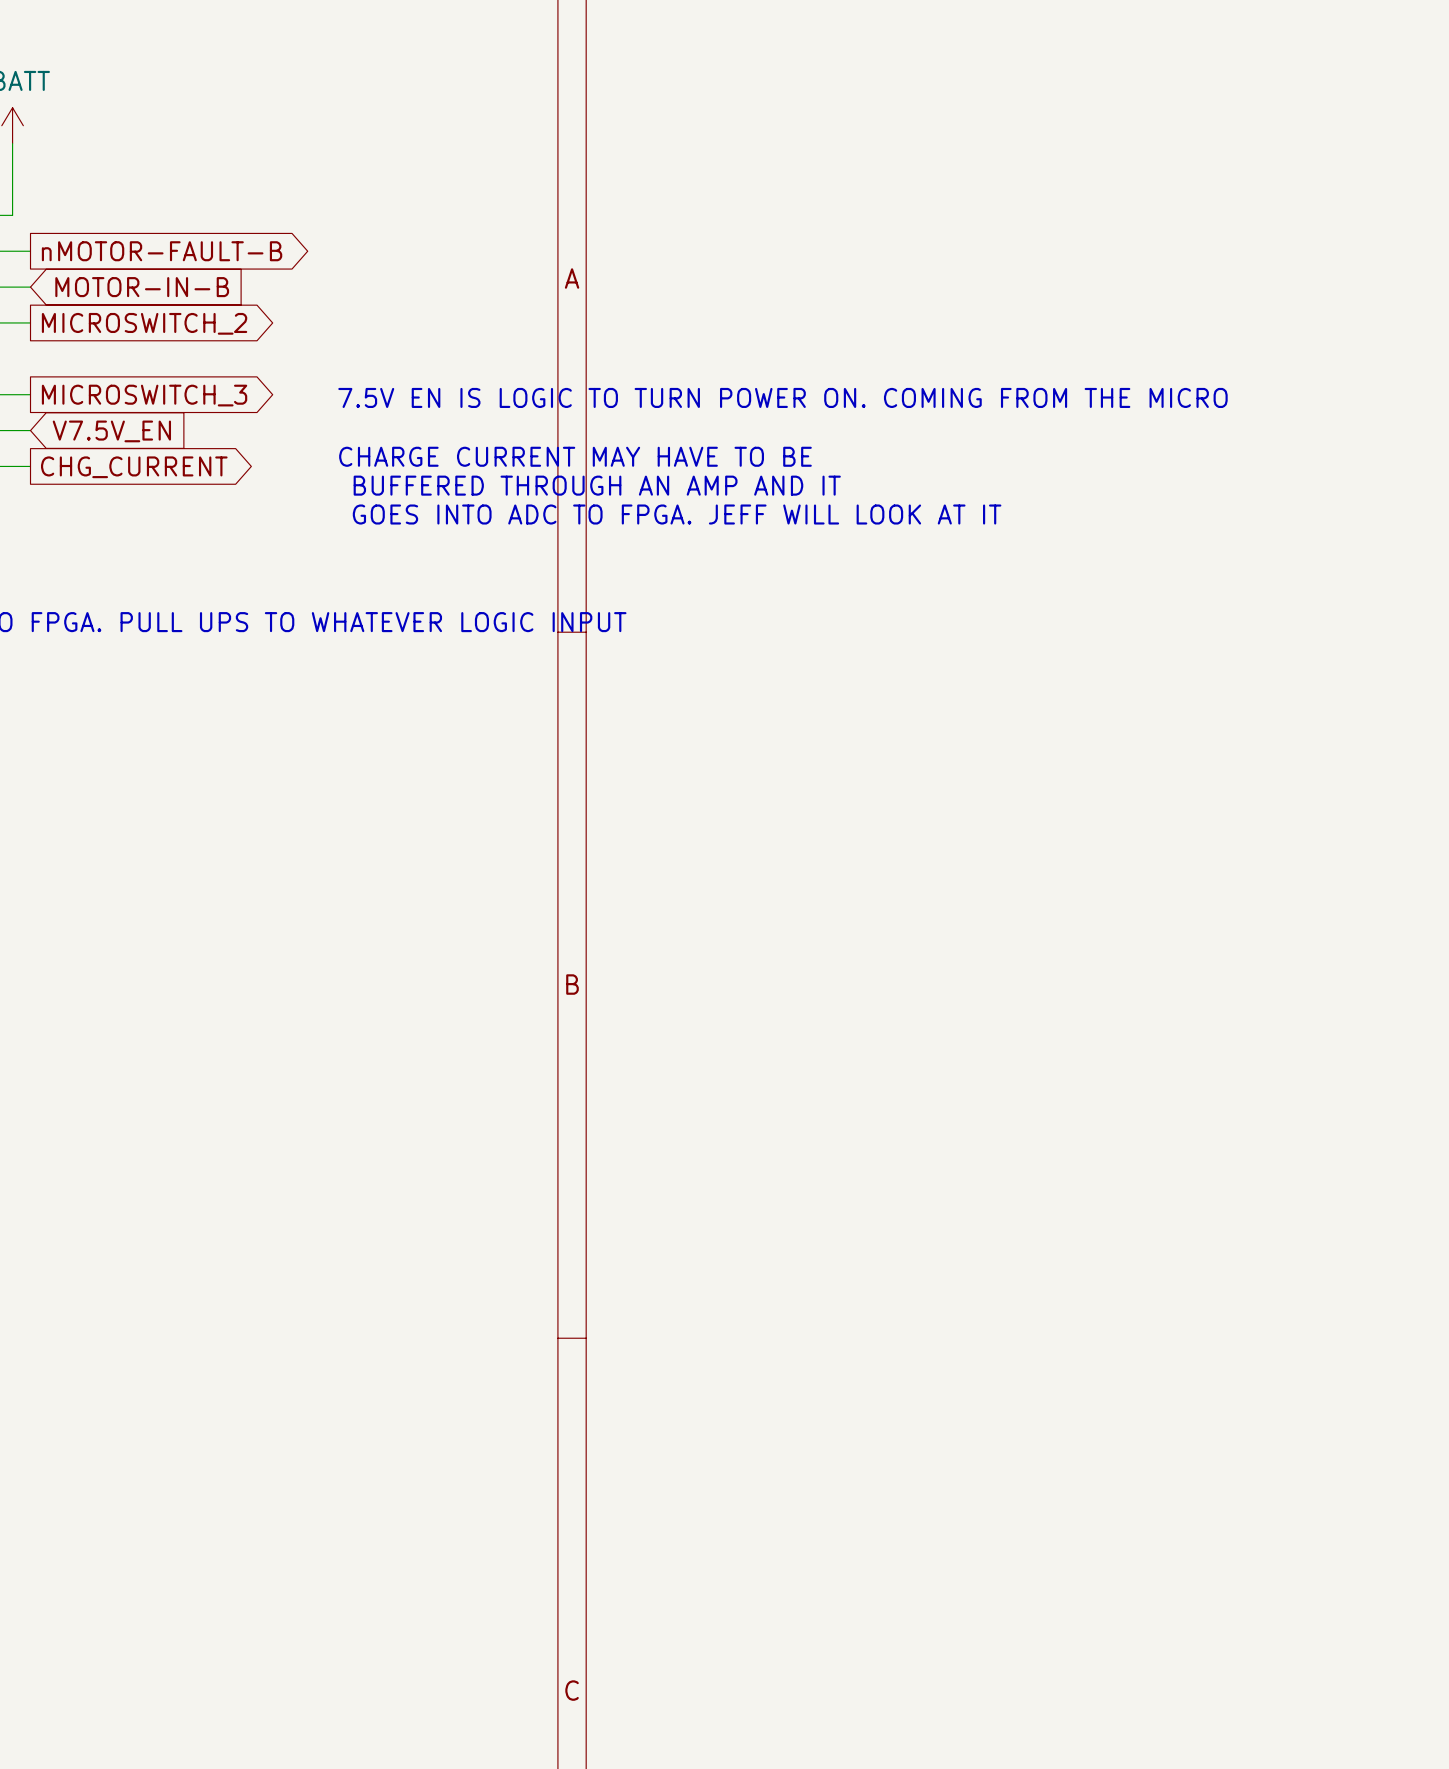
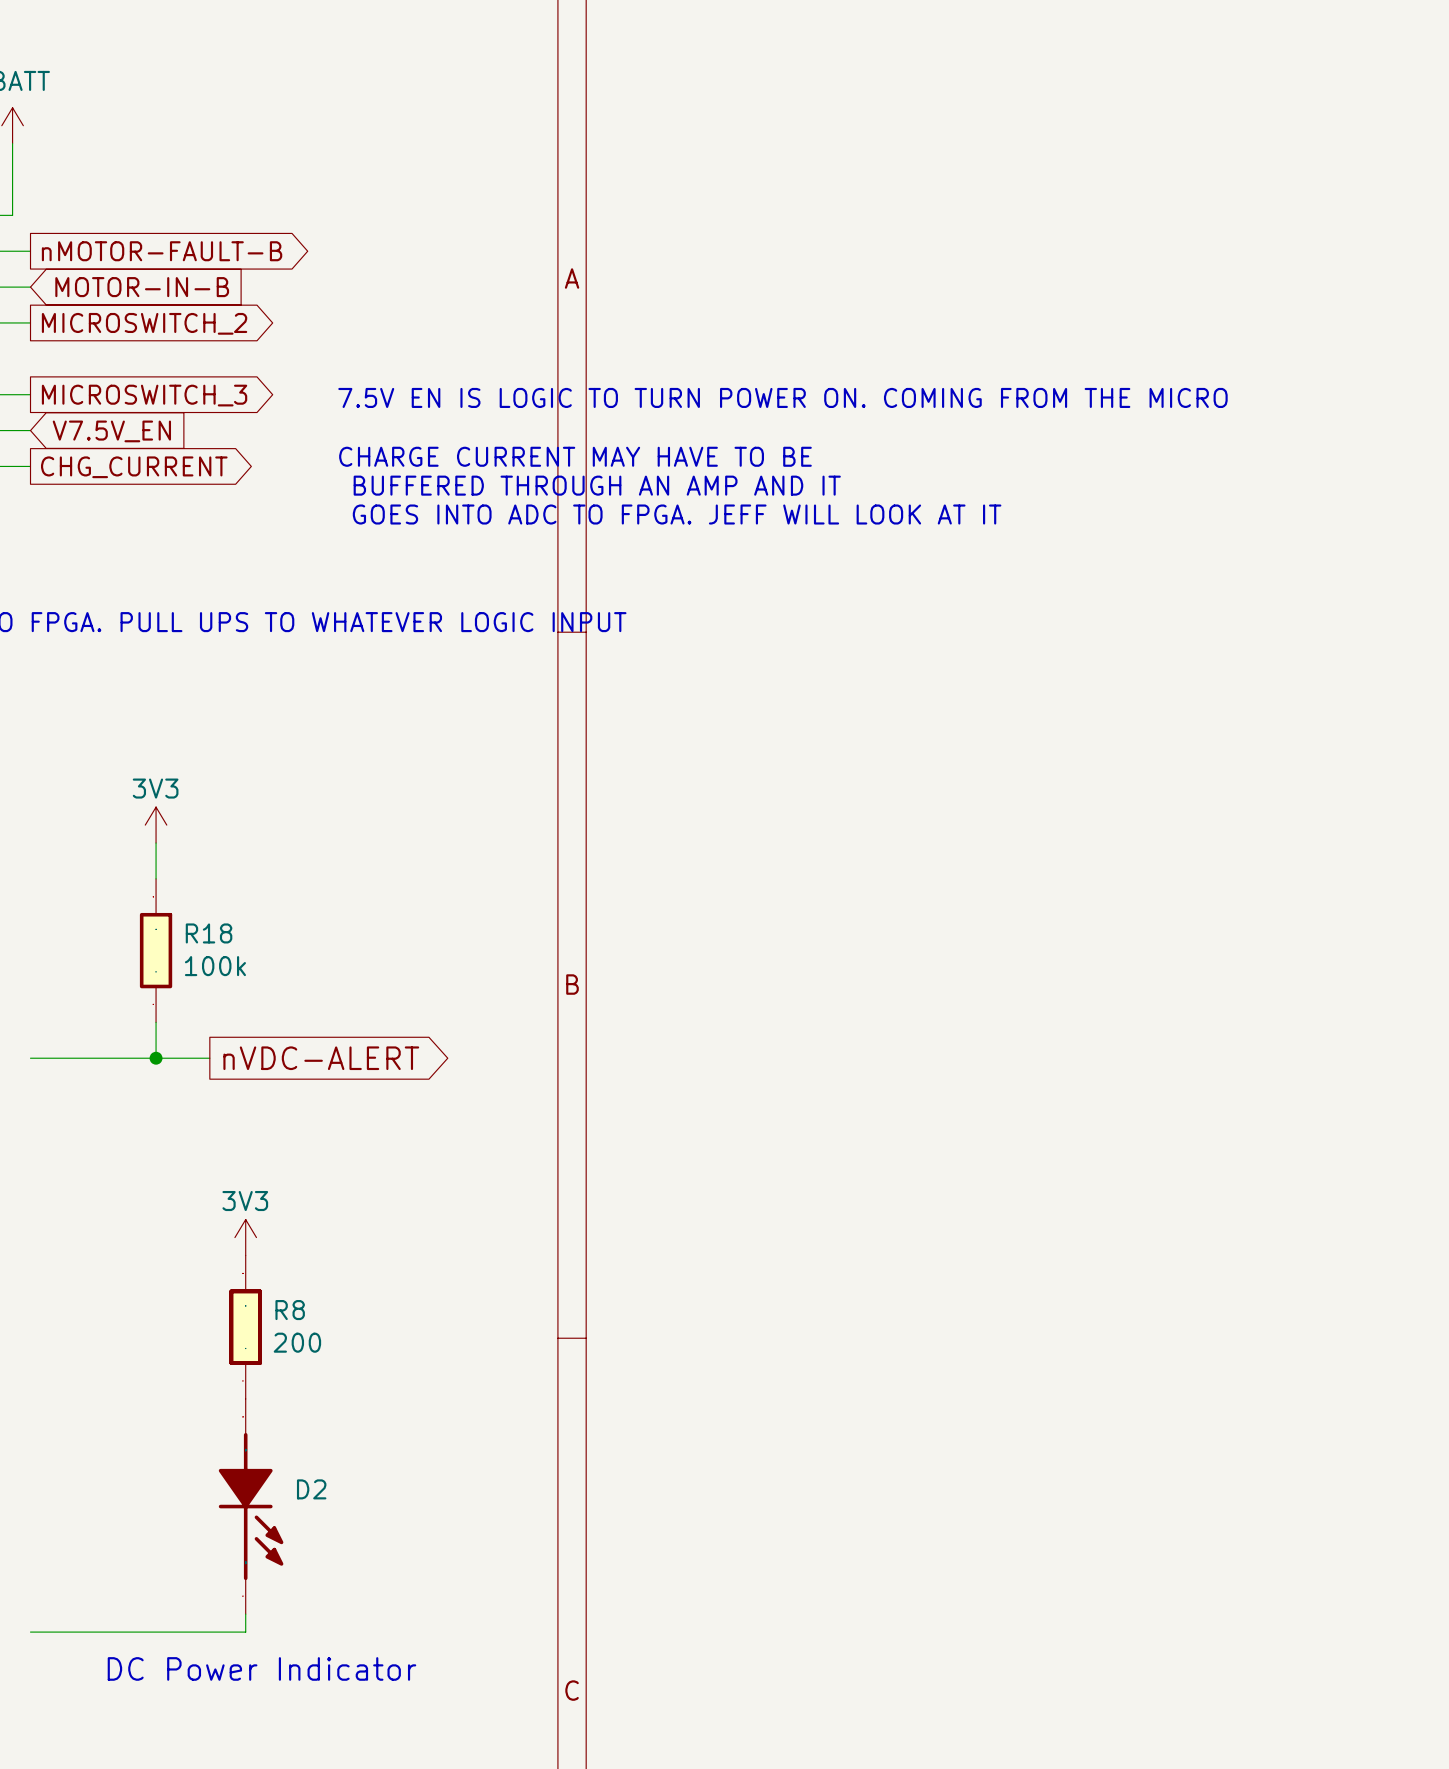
power symbol: none -> 3V3 (156, 825)
wire: none -> (156, 843) (156, 878)
R18: none -> (156, 950)
wire: none -> (156, 1022) (156, 1058)
wire: none -> (30, 1058) (209, 1058)
junction: none -> (156, 1058)
global label: none -> nVDC-ALERT (321, 1058)
power symbol: none -> 3V3 (245, 1237)
R8: none -> (245, 1327)
D2: none -> (251, 1506)
wire: none -> (245, 1614) (245, 1632) (30, 1632)
text: none -> DC Power Indicator (261, 1668)

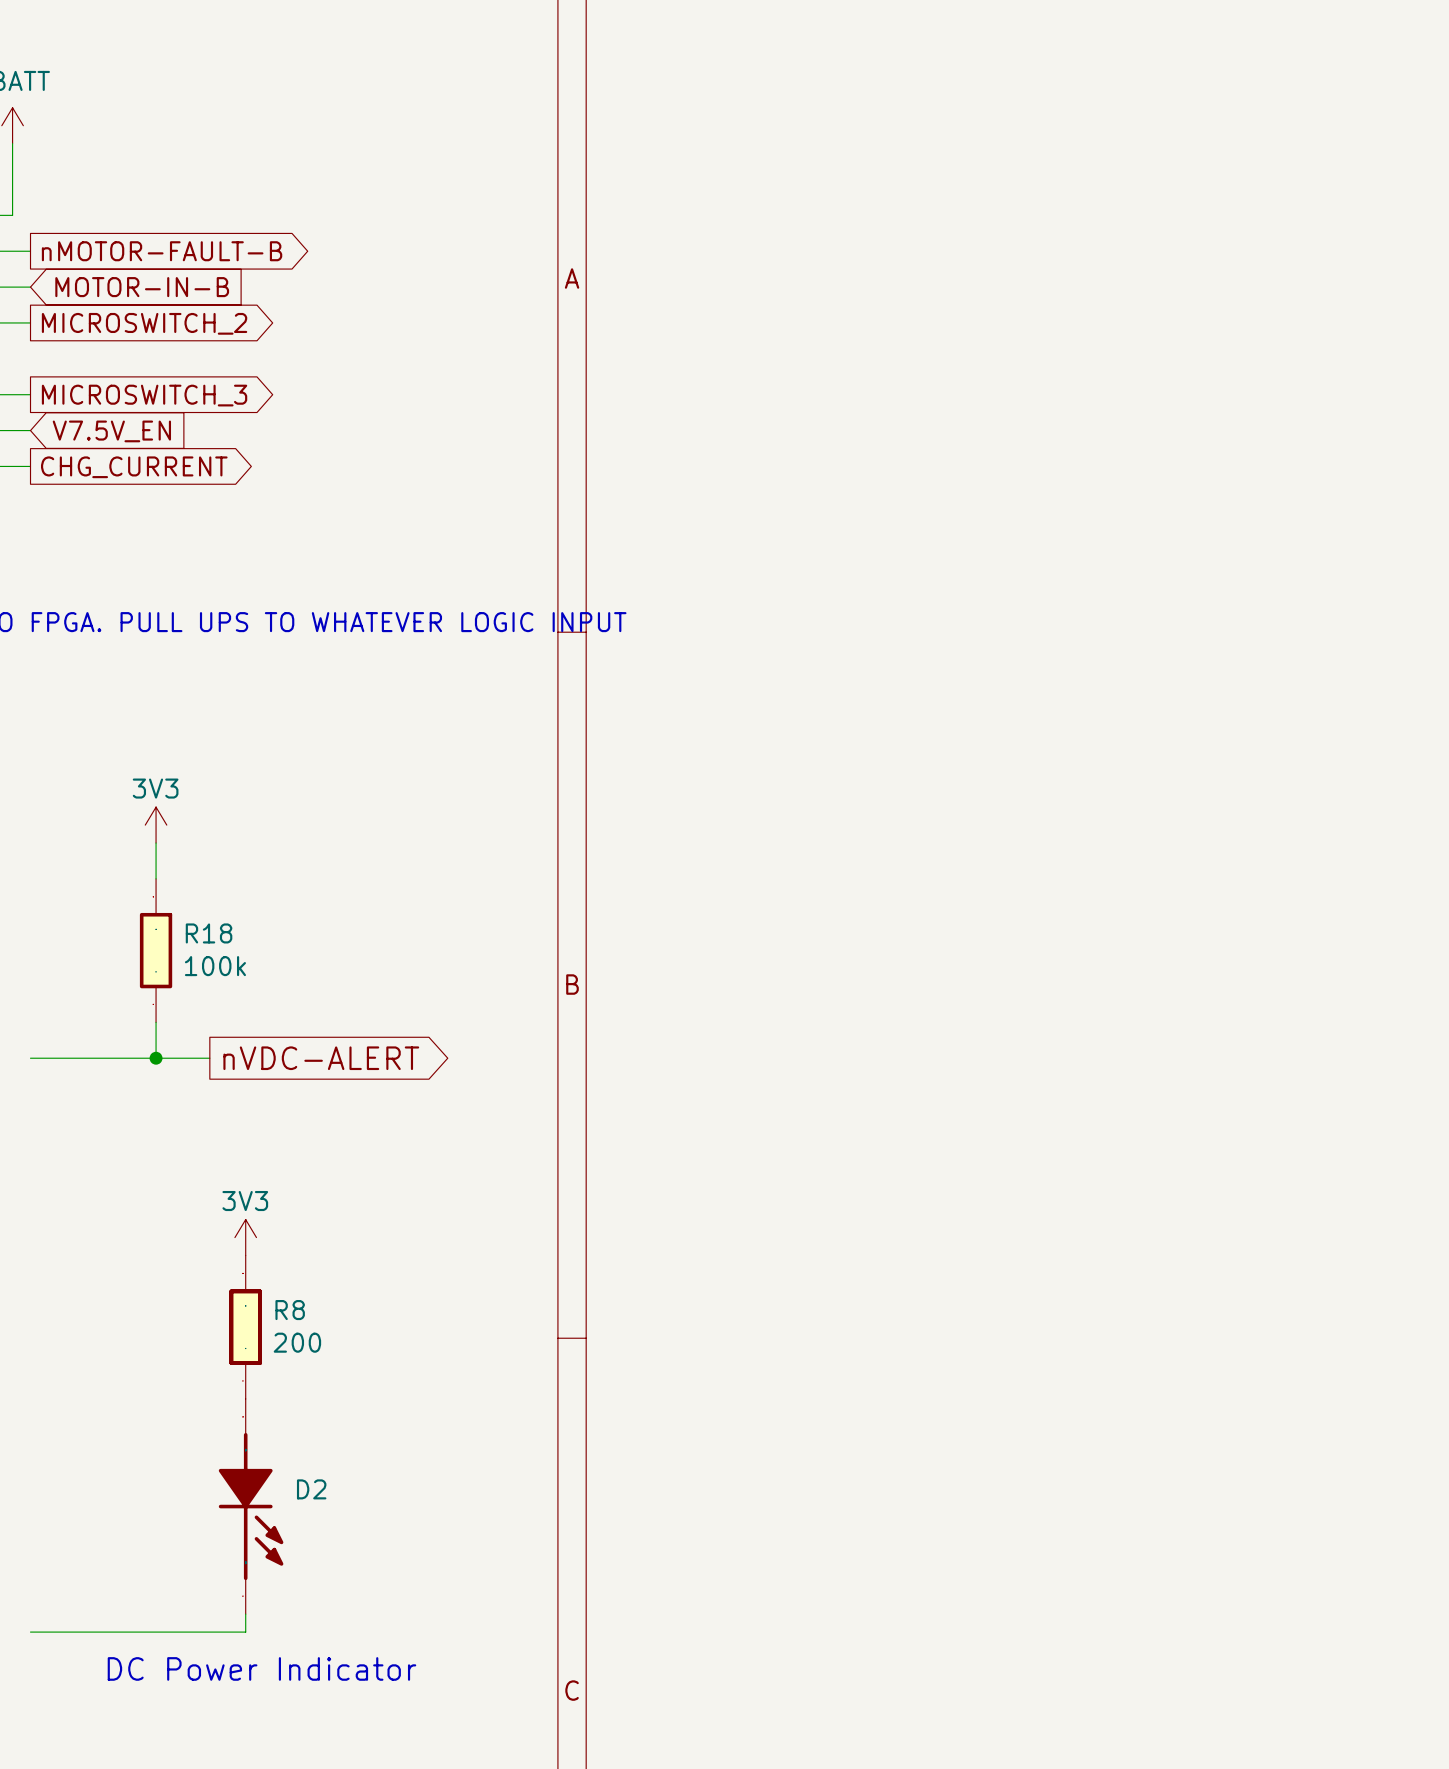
text: 7.5V EN IS LOGIC TO TURN POWER ON. COMING FROM THE MICRO (782, 397) -> none
text: CHARGE CURRENT MAY HAVE TO BE (575, 456) -> none
text: BUFFERED THROUGH AN AMP AND IT (597, 485) -> none
text: GOES INTO ADC TO FPGA. JEFF WILL LOOK AT IT (677, 514) -> none

